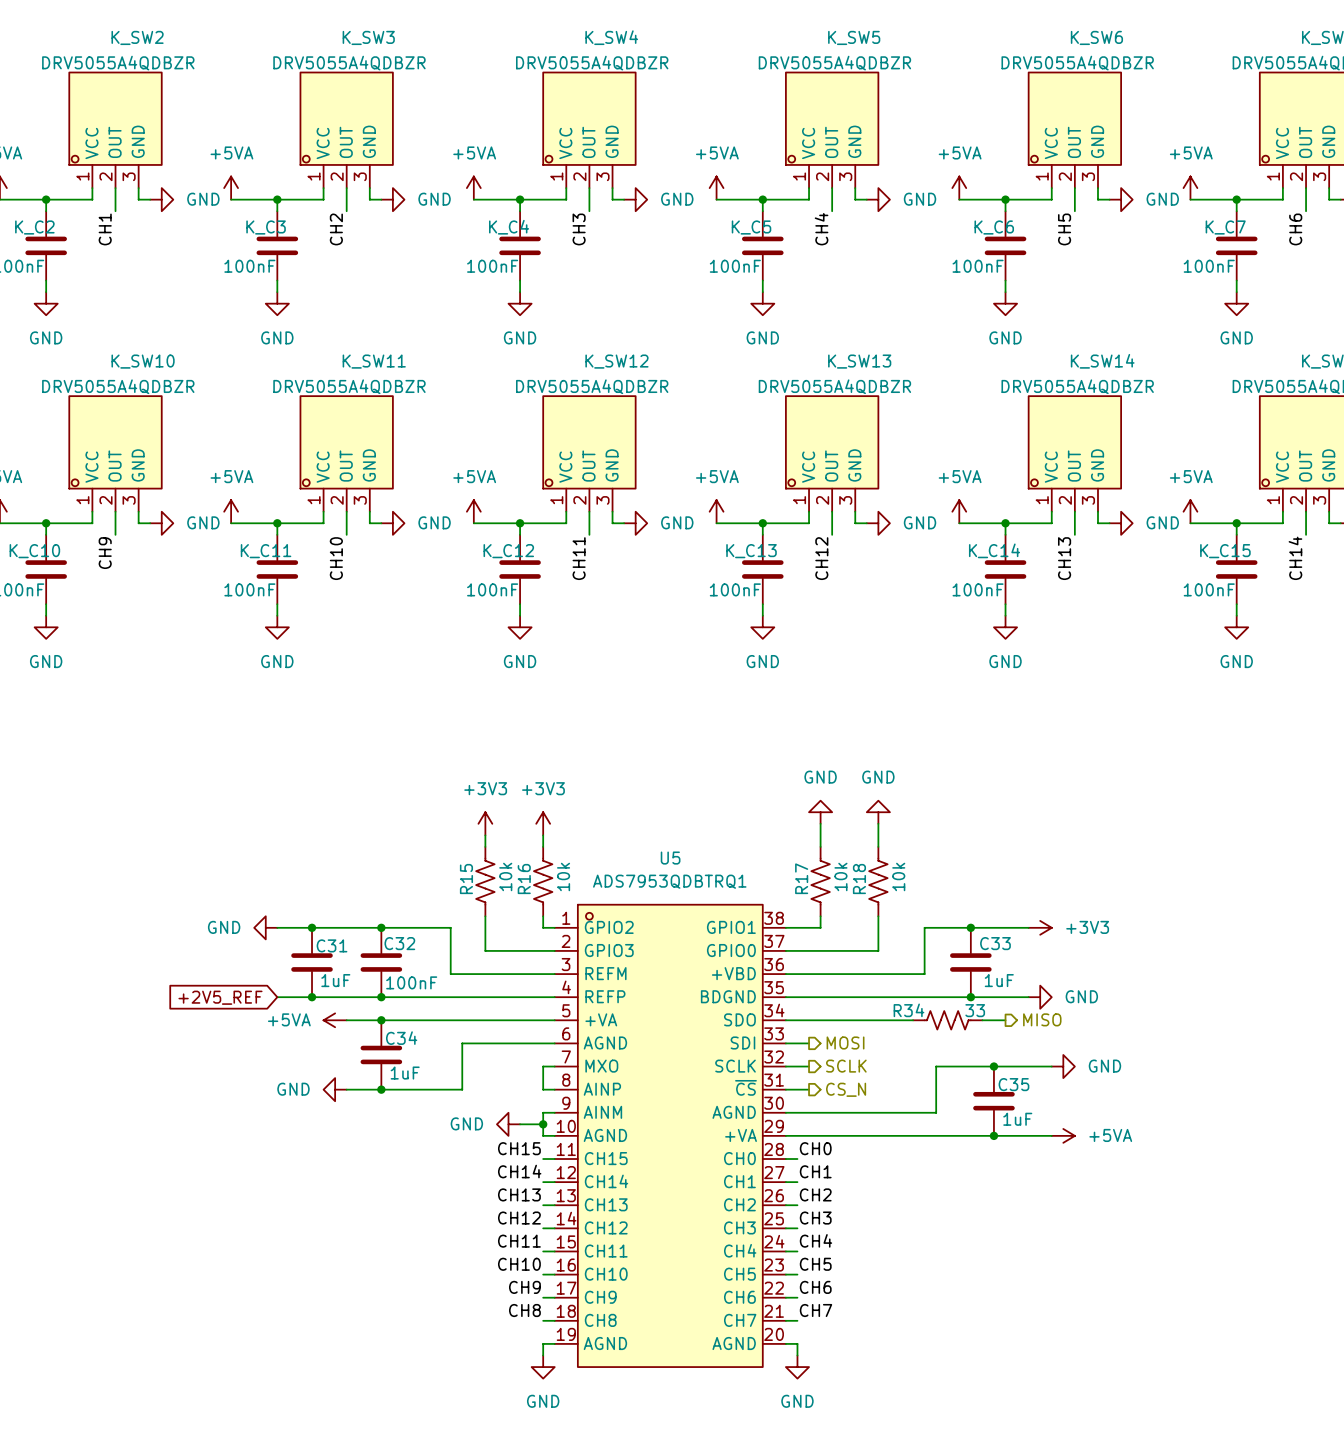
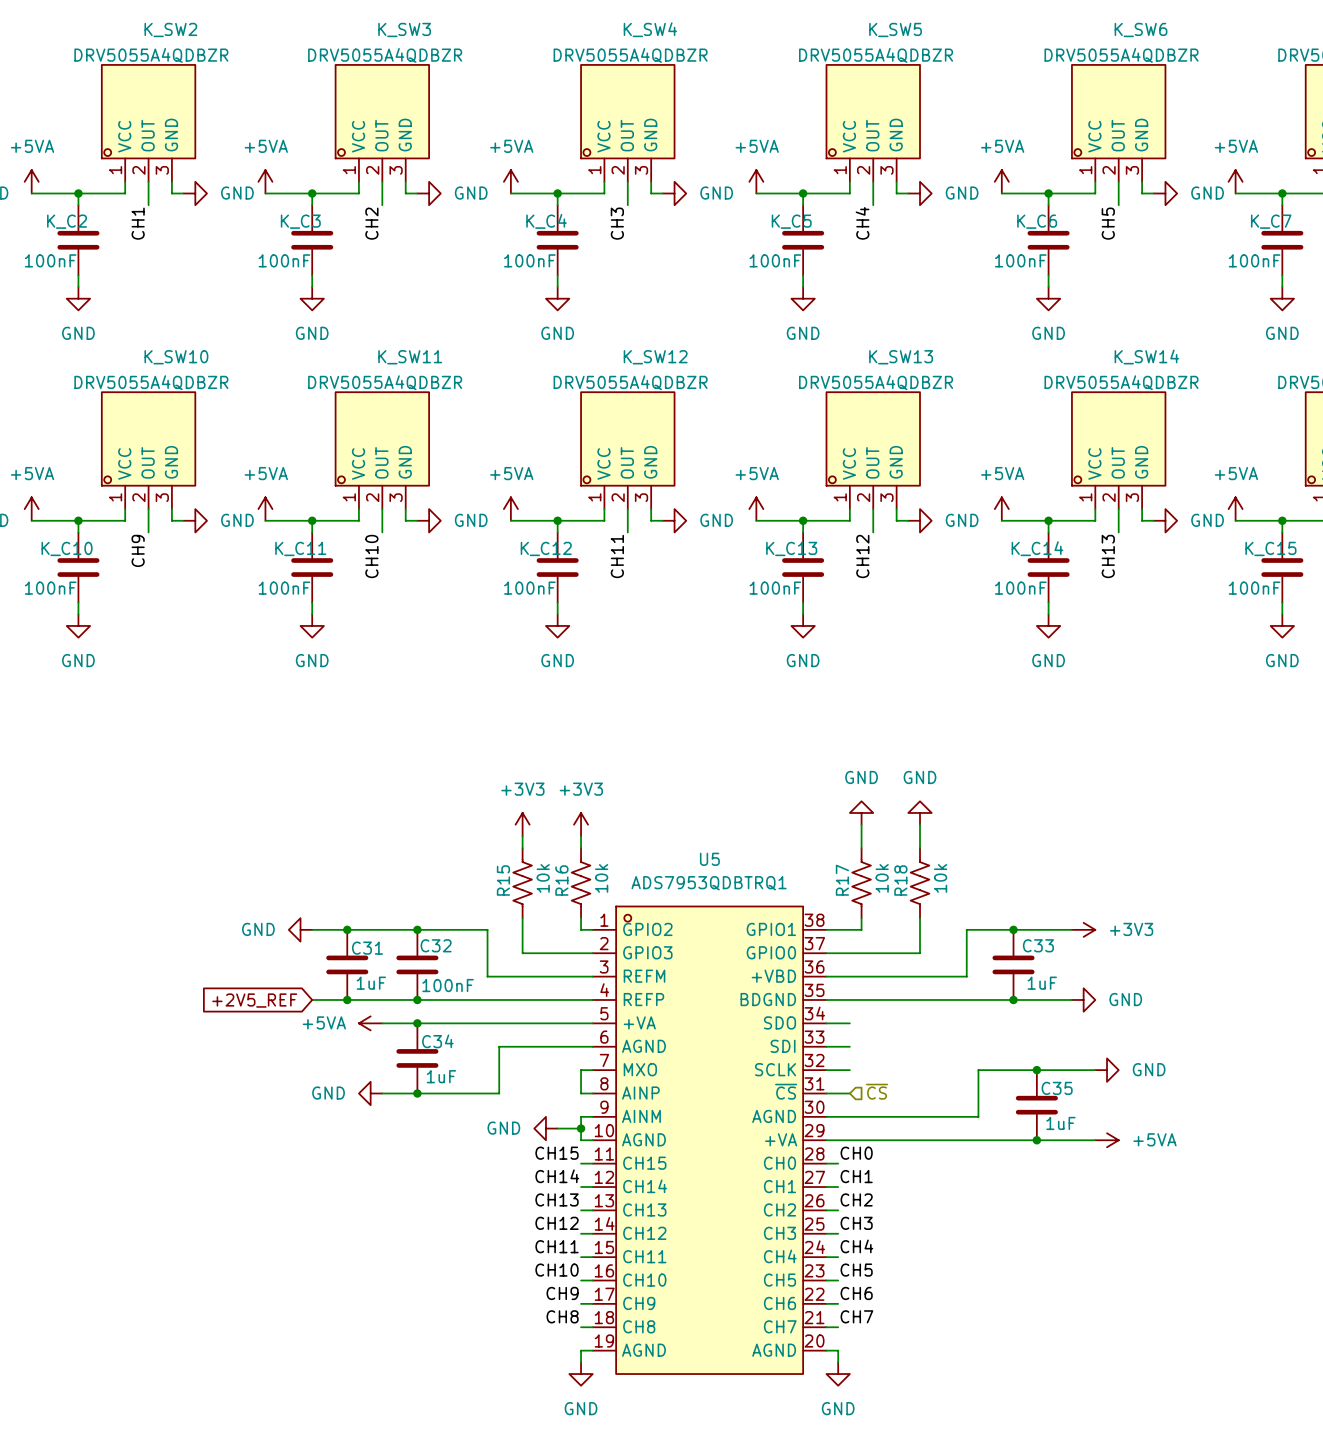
hierarchical label: MISO (1042, 1019) -> none
wire: (809, 1020) (913, 1020) -> none
R34: 33 (947, 1020) -> none
wire: (982, 1020) (1005, 1020) -> none
hierarchical label: MOSI (845, 1042) -> none
hierarchical label: SCLK (846, 1066) -> none
hierarchical label shape: output (846, 1089) -> input (877, 1091)
hierarchical label: CS_N (846, 1089) -> ~{CS} (877, 1091)

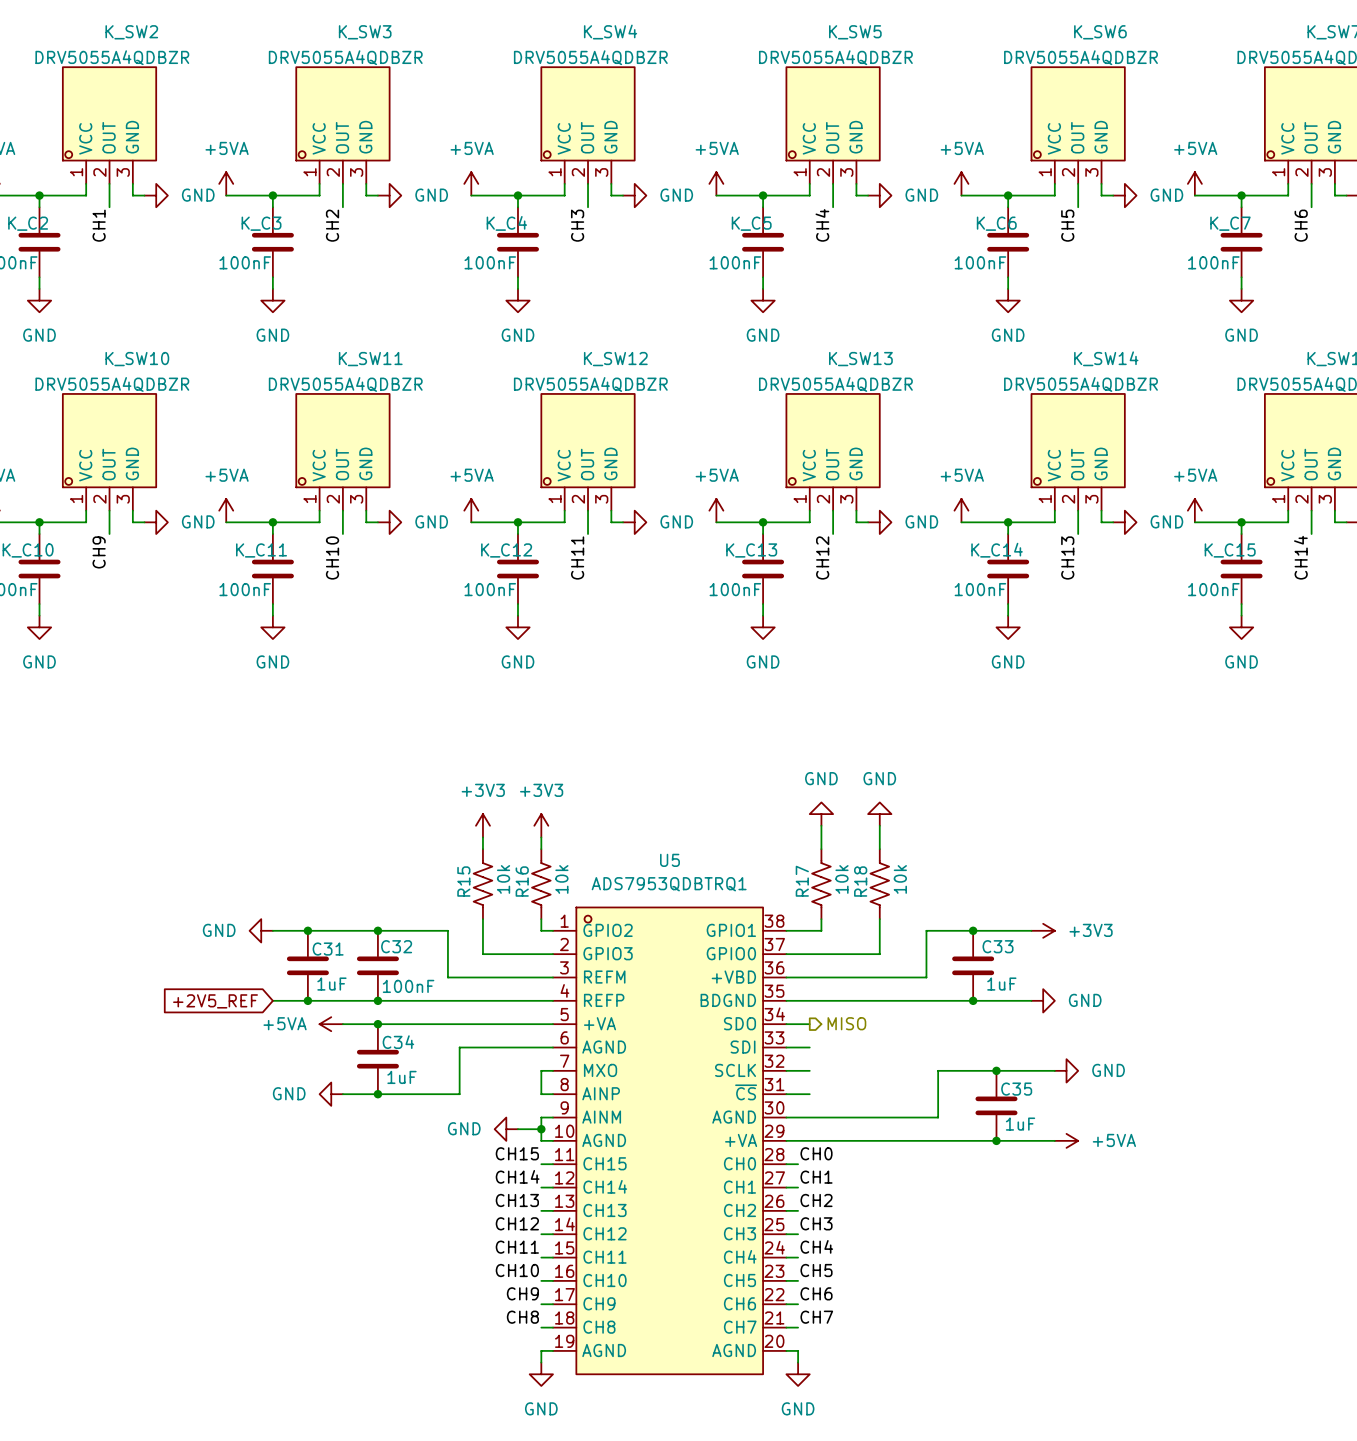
hierarchical label: none -> MISO (846, 1023)
hierarchical label: ~{CS} (877, 1091) -> none

